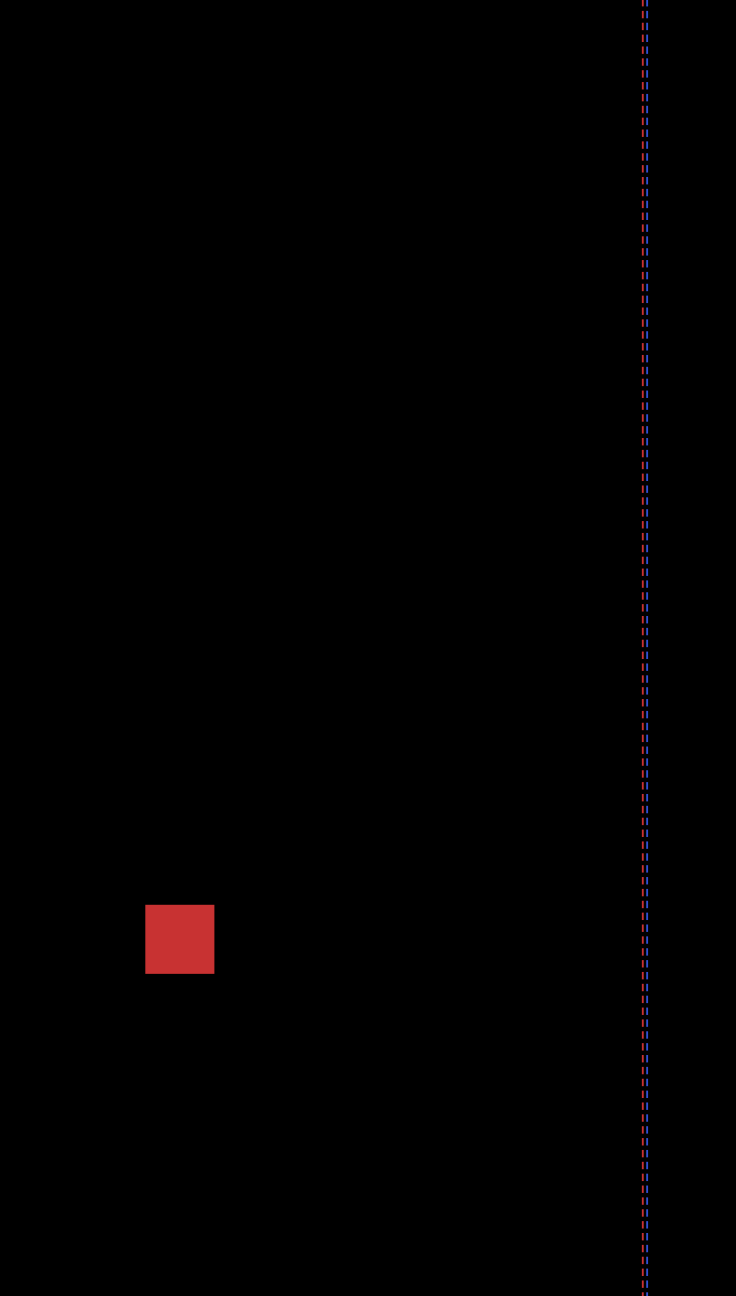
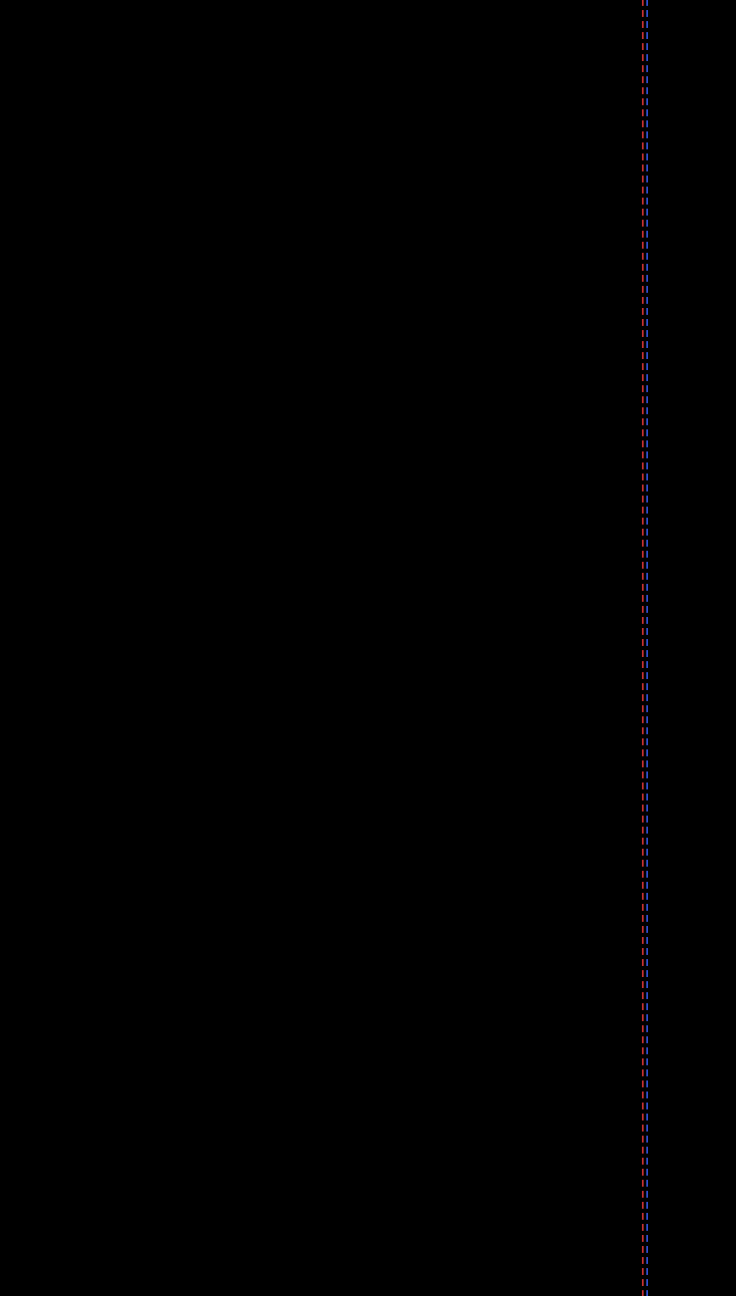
part: (179, 939) -> none

